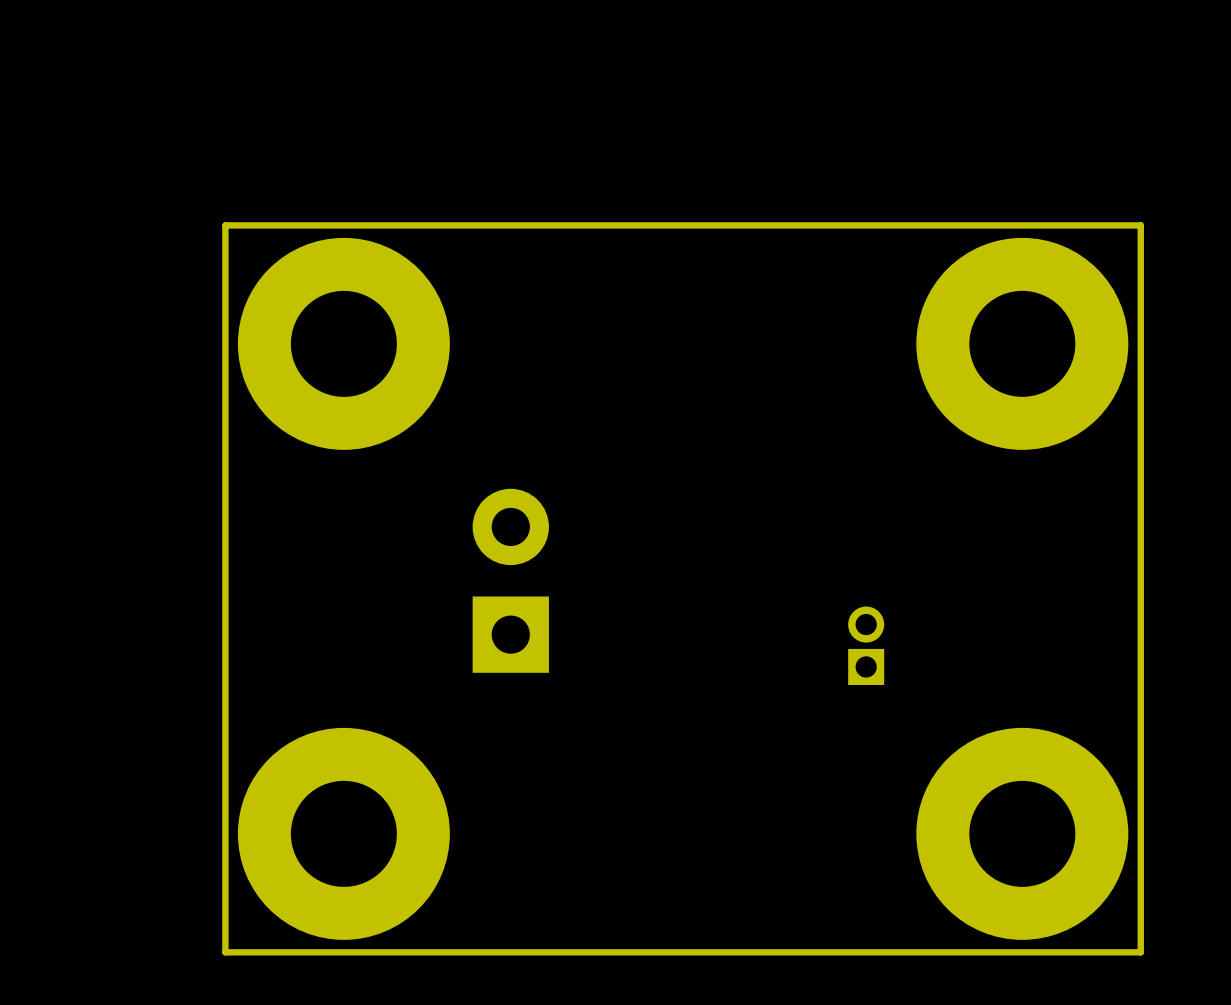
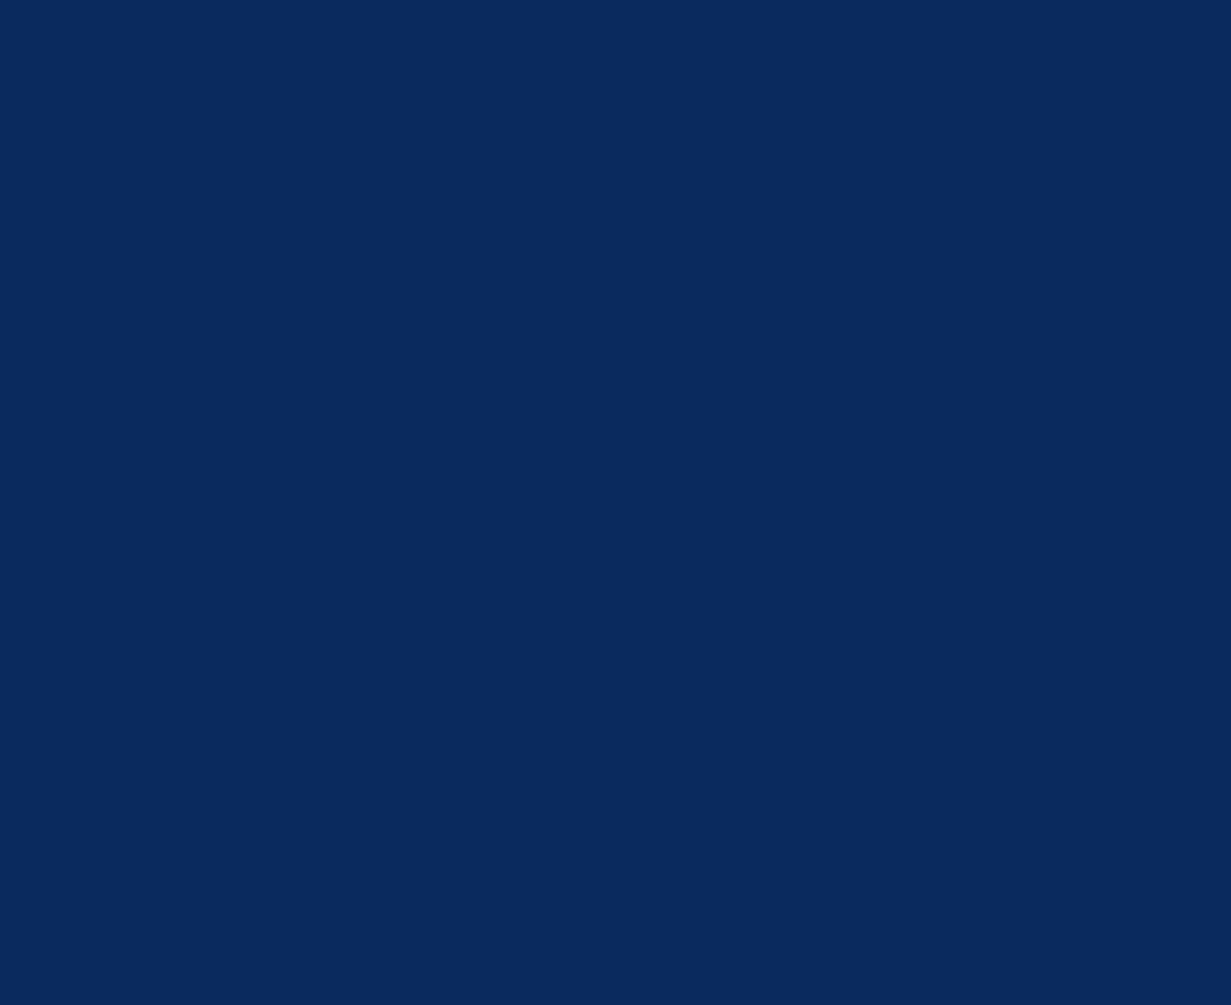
board edge: (1140, 225) (225, 225) (225, 952) (1140, 952) (1140, 225) -> none
part: (343, 343) -> none
part: (1022, 343) -> none
part: (510, 580) -> none
part: (866, 645) -> none
part: (343, 833) -> none
part: (1022, 833) -> none

